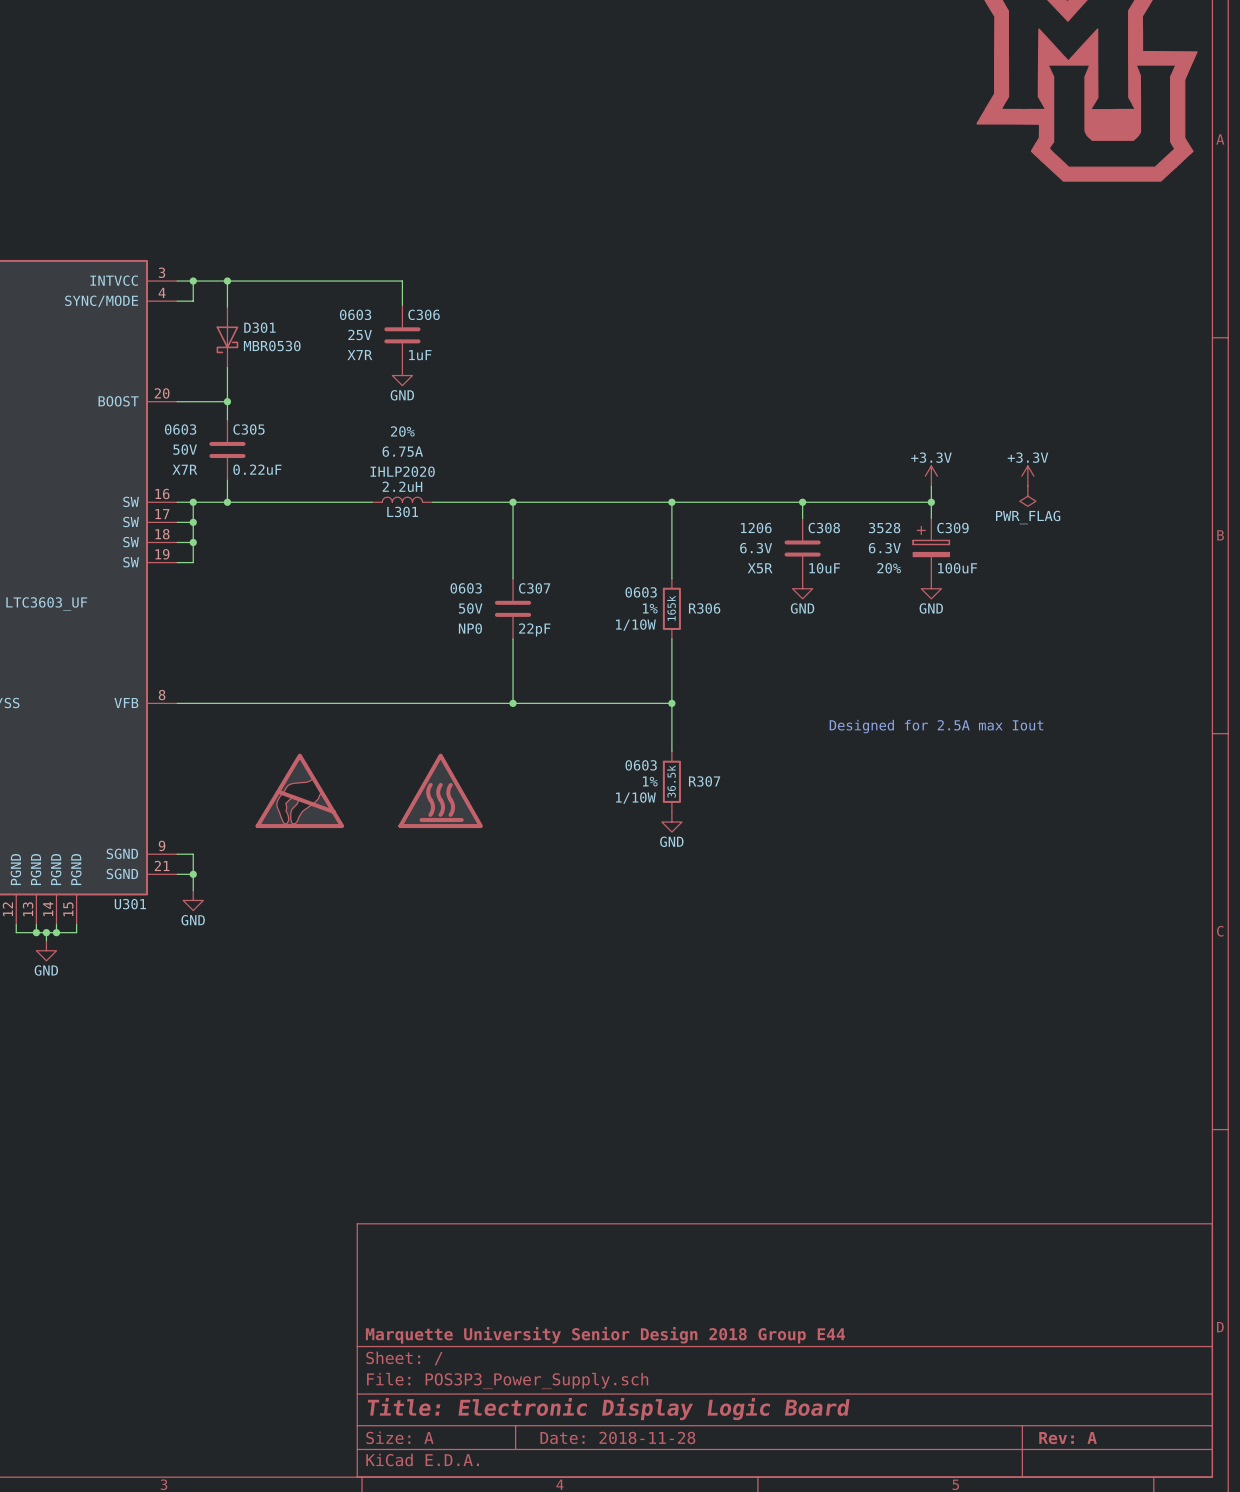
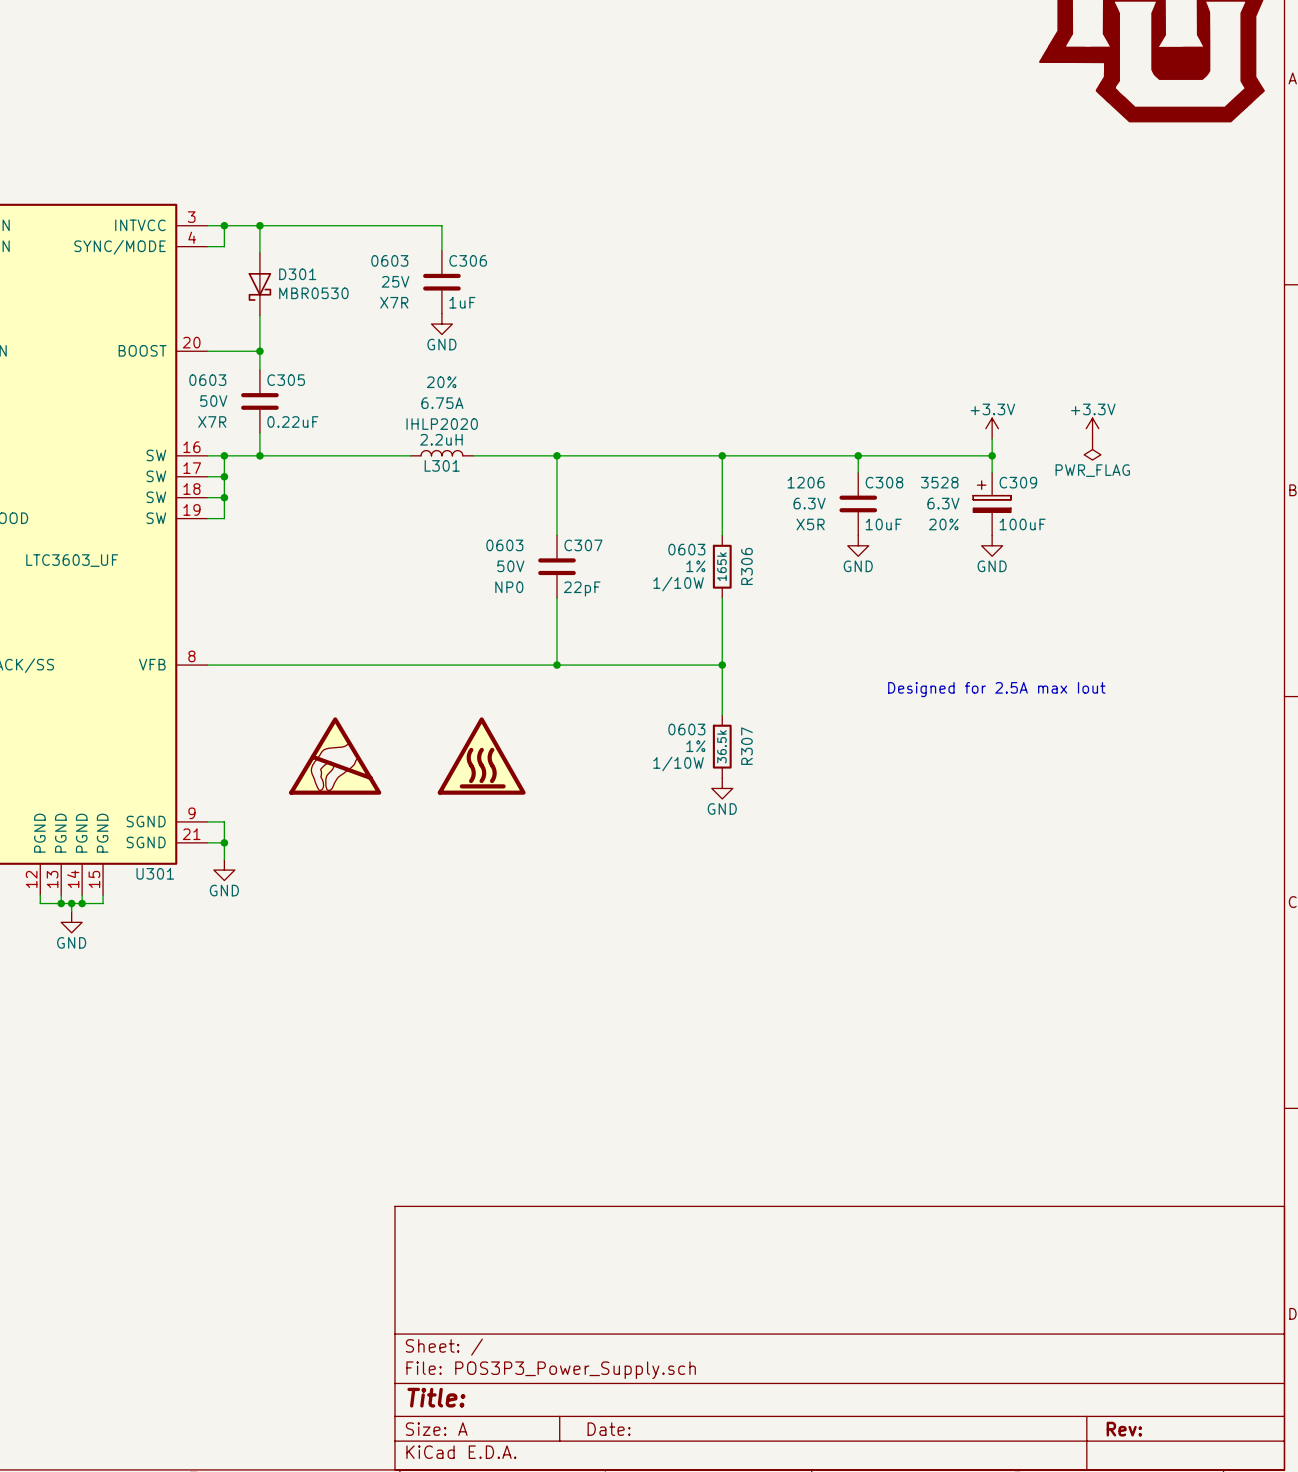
R306 name rotation: 0° (704, 608) -> 90° counterclockwise (746, 566)
R307 name rotation: 0° (704, 781) -> 90° counterclockwise (746, 746)
title block: Marquette University Senior Design 2018 Group E44 (605, 1335) -> none
title block: Title: Electronic Display Logic Board (608, 1409) -> Title: (436, 1397)
title block: Date: 2018-11-28 (617, 1437) -> Date: (609, 1429)
title block: Rev: A (1068, 1438) -> Rev: (1124, 1429)

